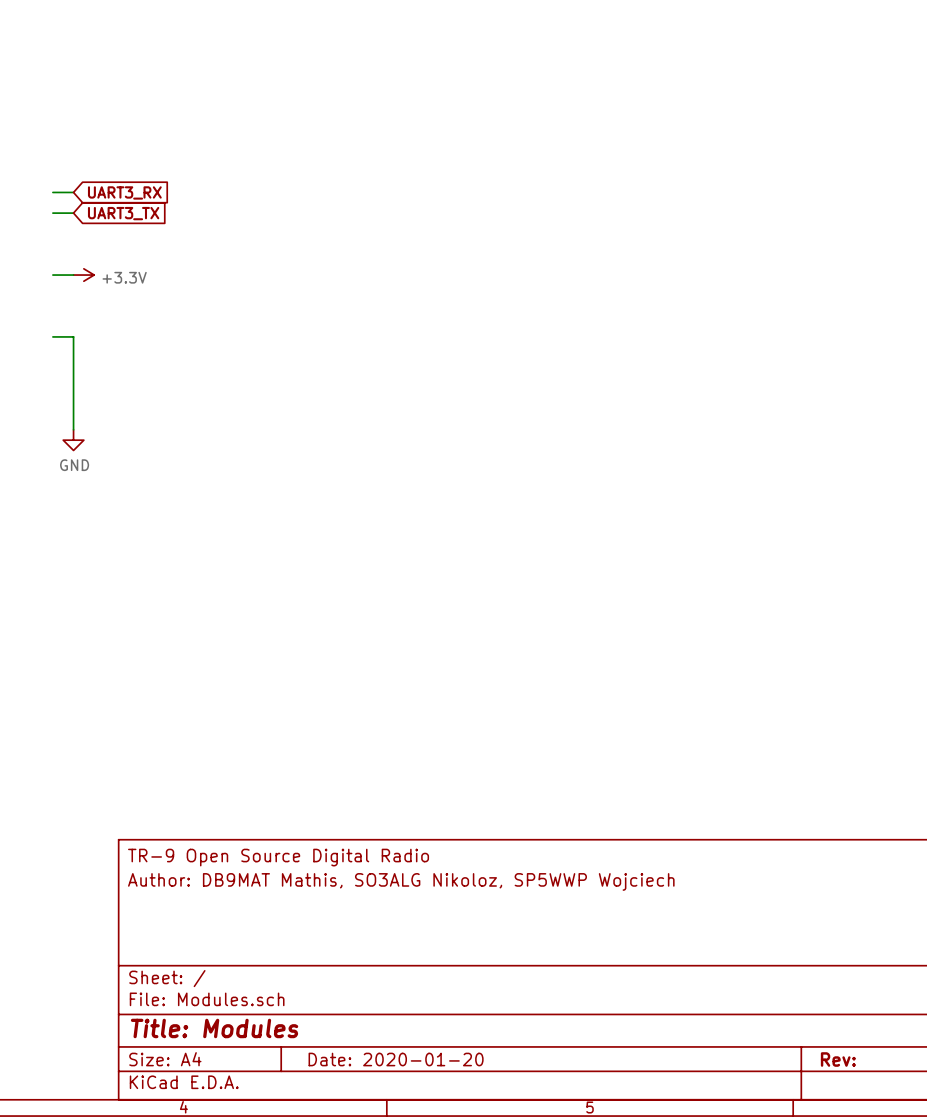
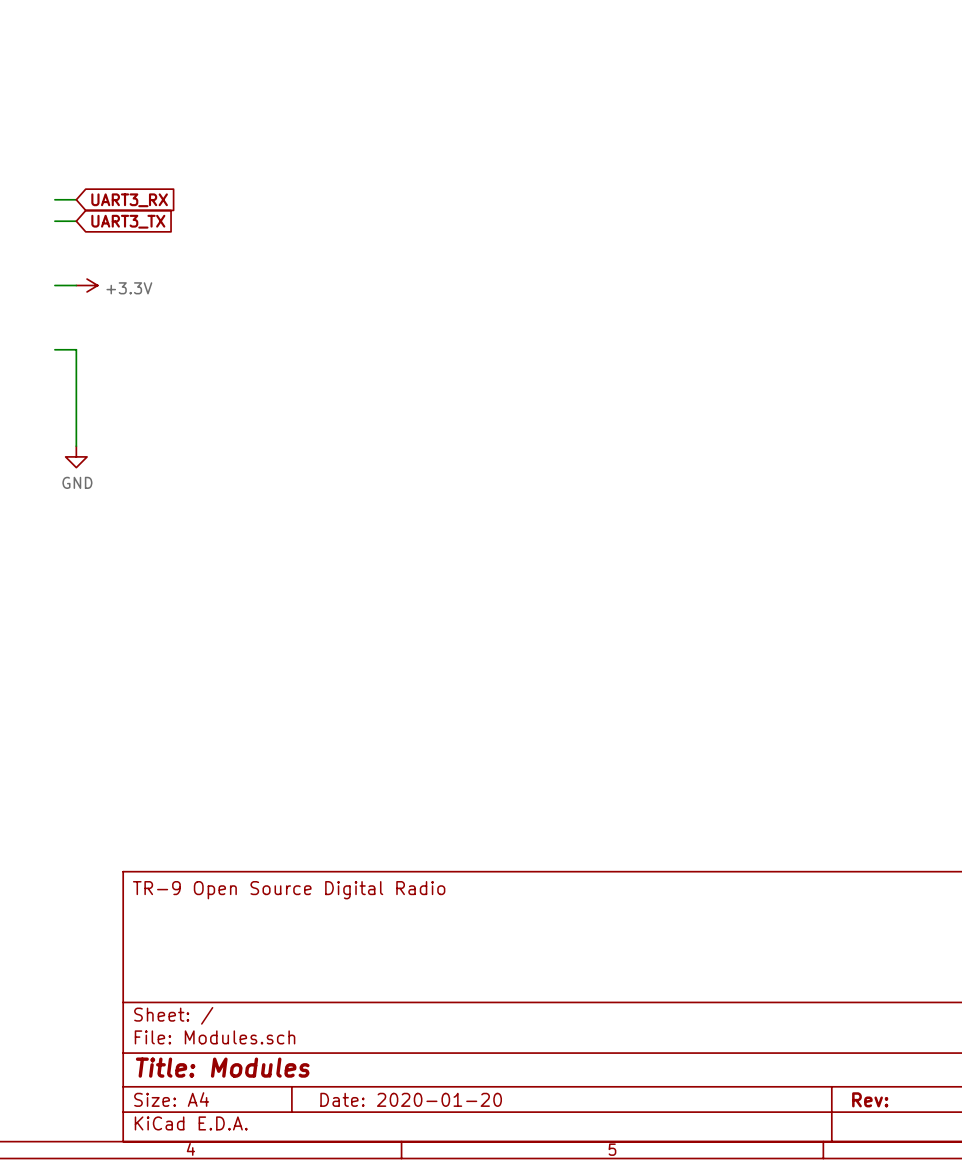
title block: Author: DB9MAT Mathis, SO3ALG Nikoloz, SP5WWP Wojciech (401, 881) -> none

